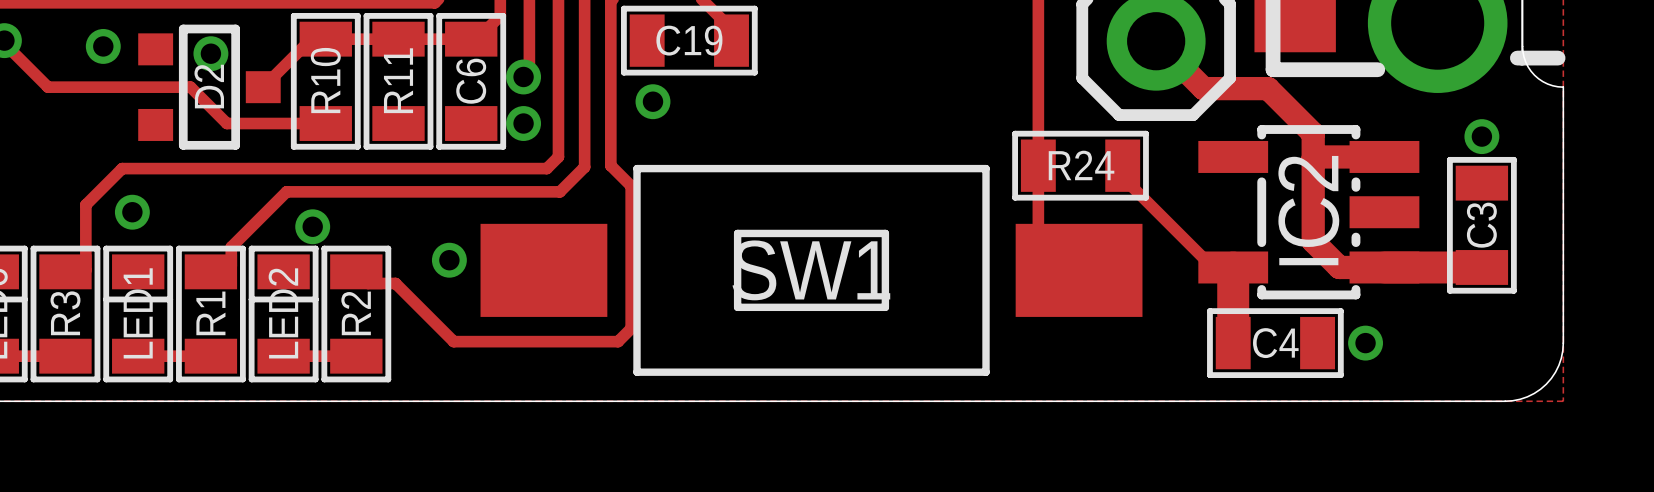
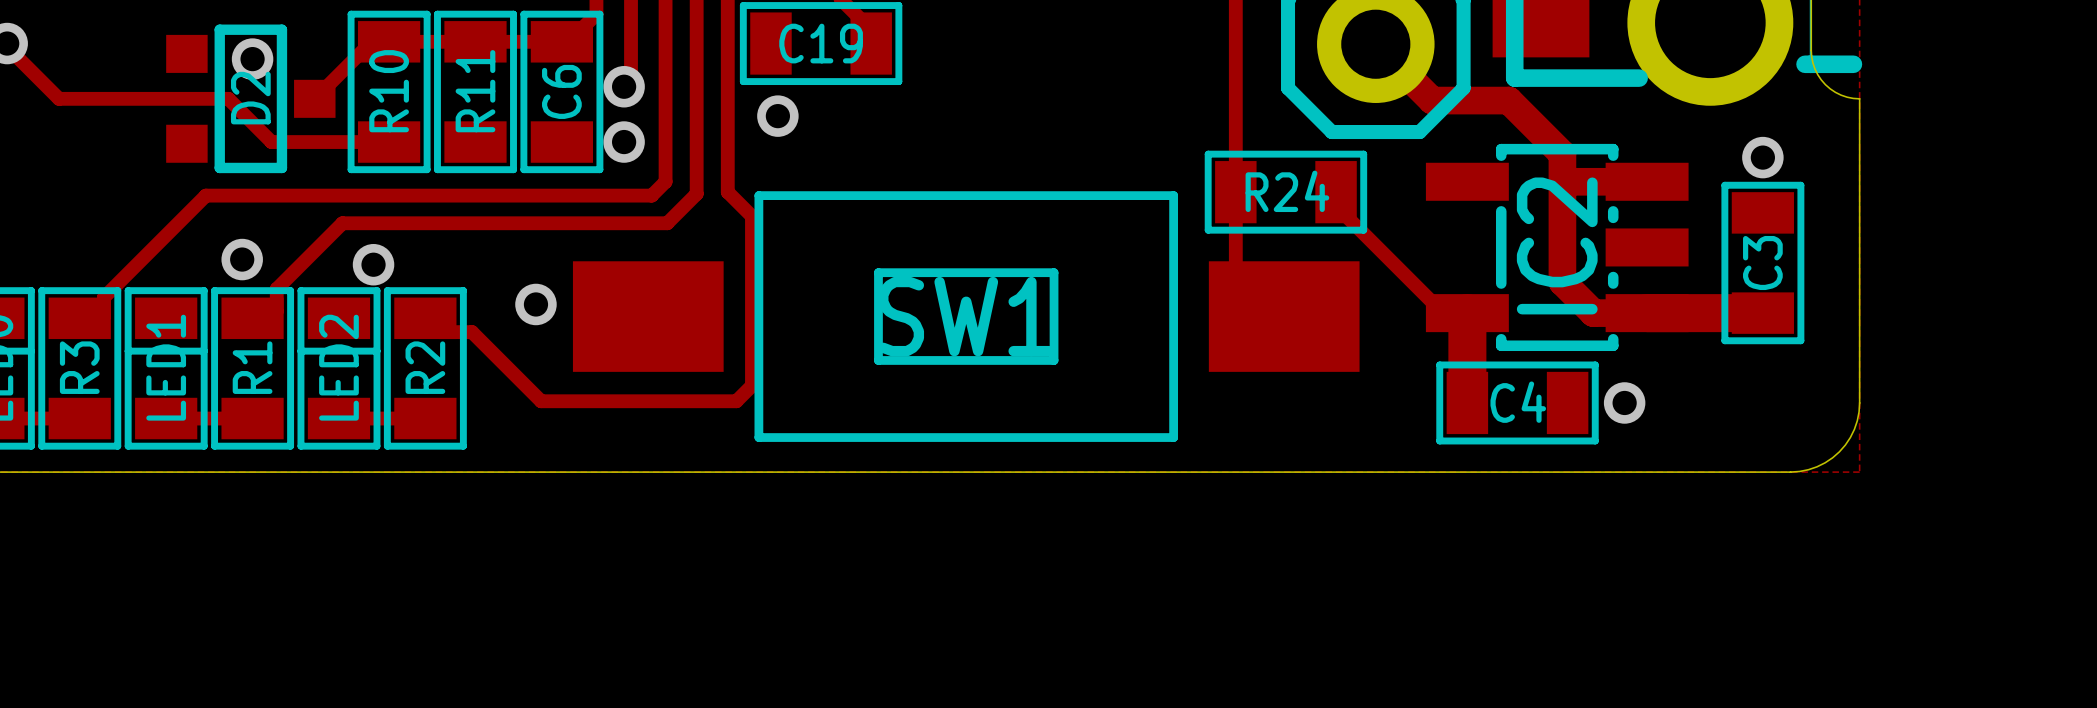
via: (103, 46) -> none
track: (171, 168) (122, 168) (85, 204) (85, 254) -> (205, 195) (103, 297)
via position: (132, 212) -> (242, 259)

